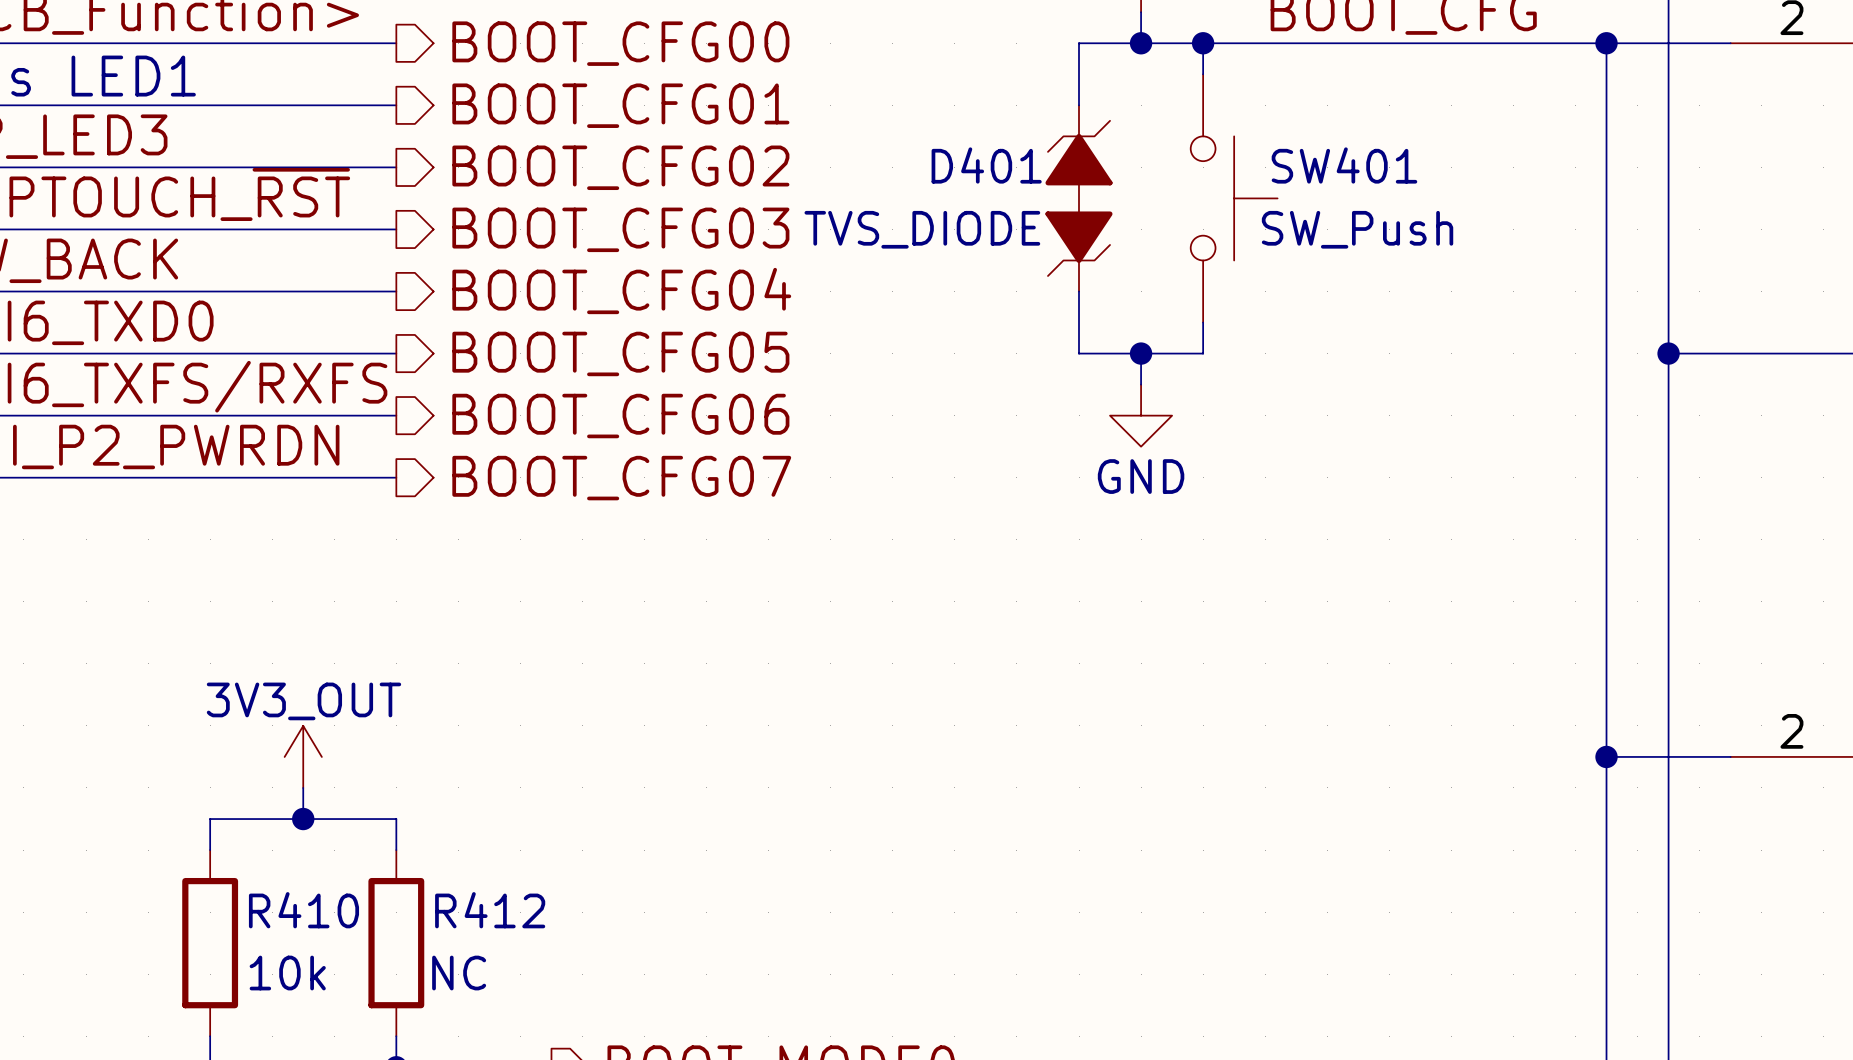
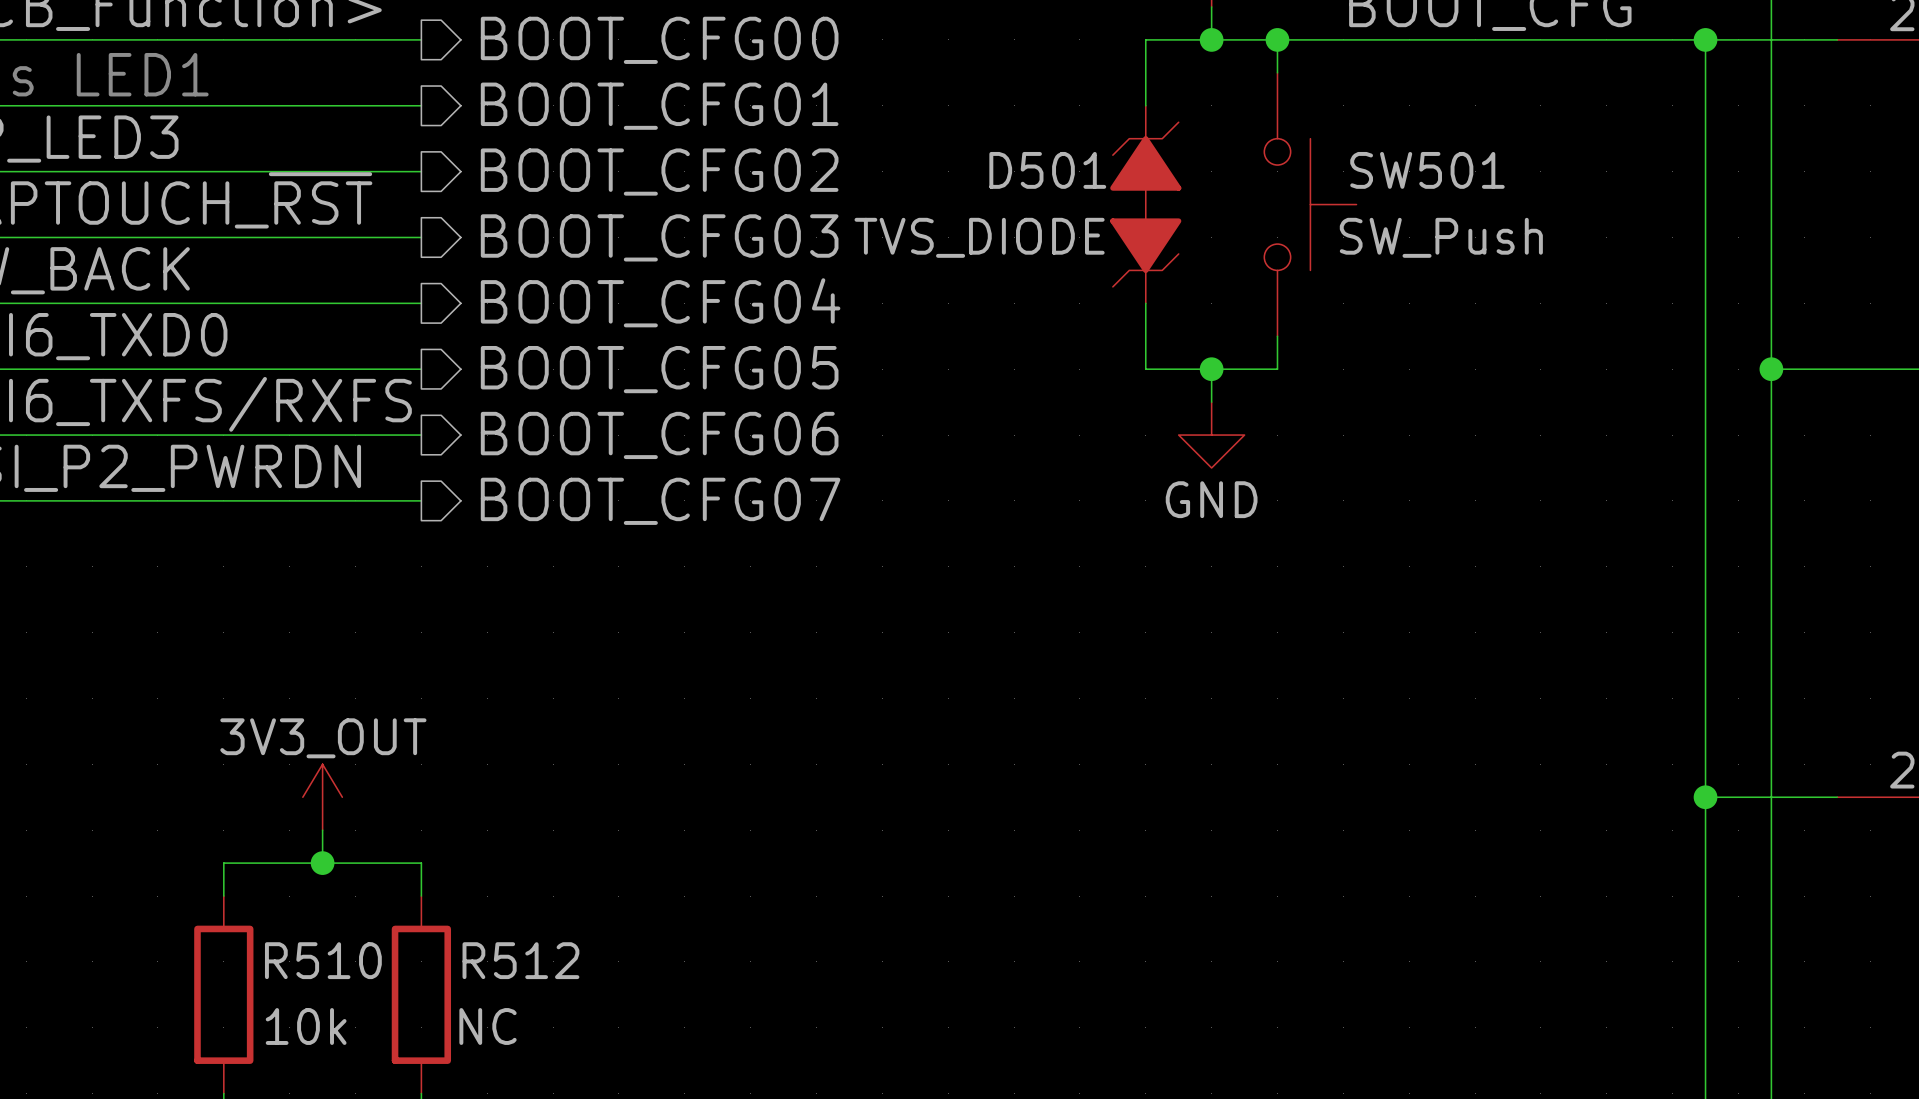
D401 name: D401 (986, 165) -> D501 (1047, 170)
SW401 name: SW401 (1344, 165) -> SW501 (1427, 170)
R410 name: R410 (303, 910) -> R510 (323, 960)
R412 name: R412 (490, 910) -> R512 (520, 960)

